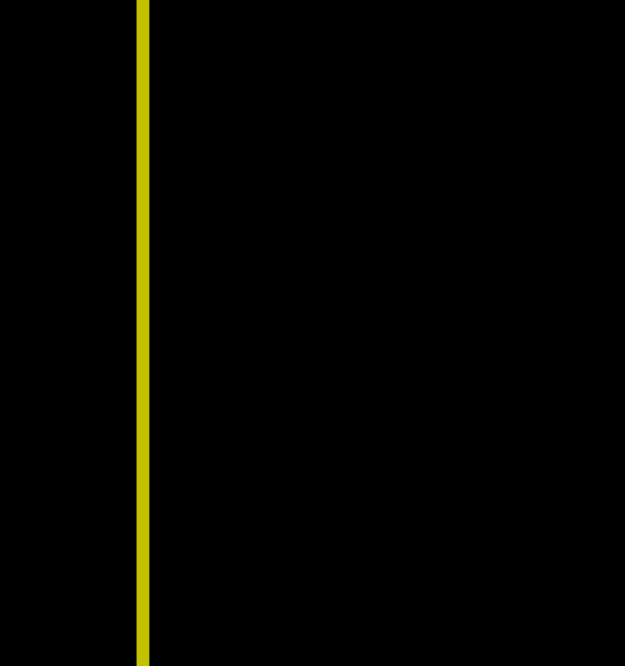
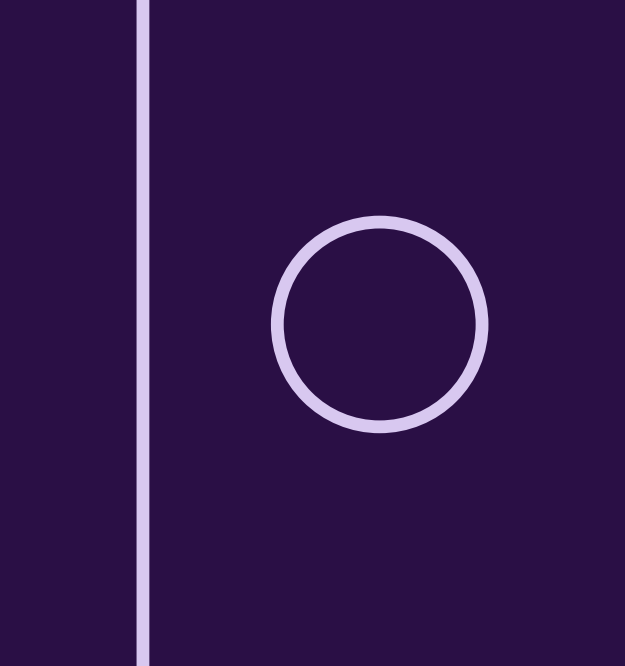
round board edge: none -> [270, 215, 489, 434]

